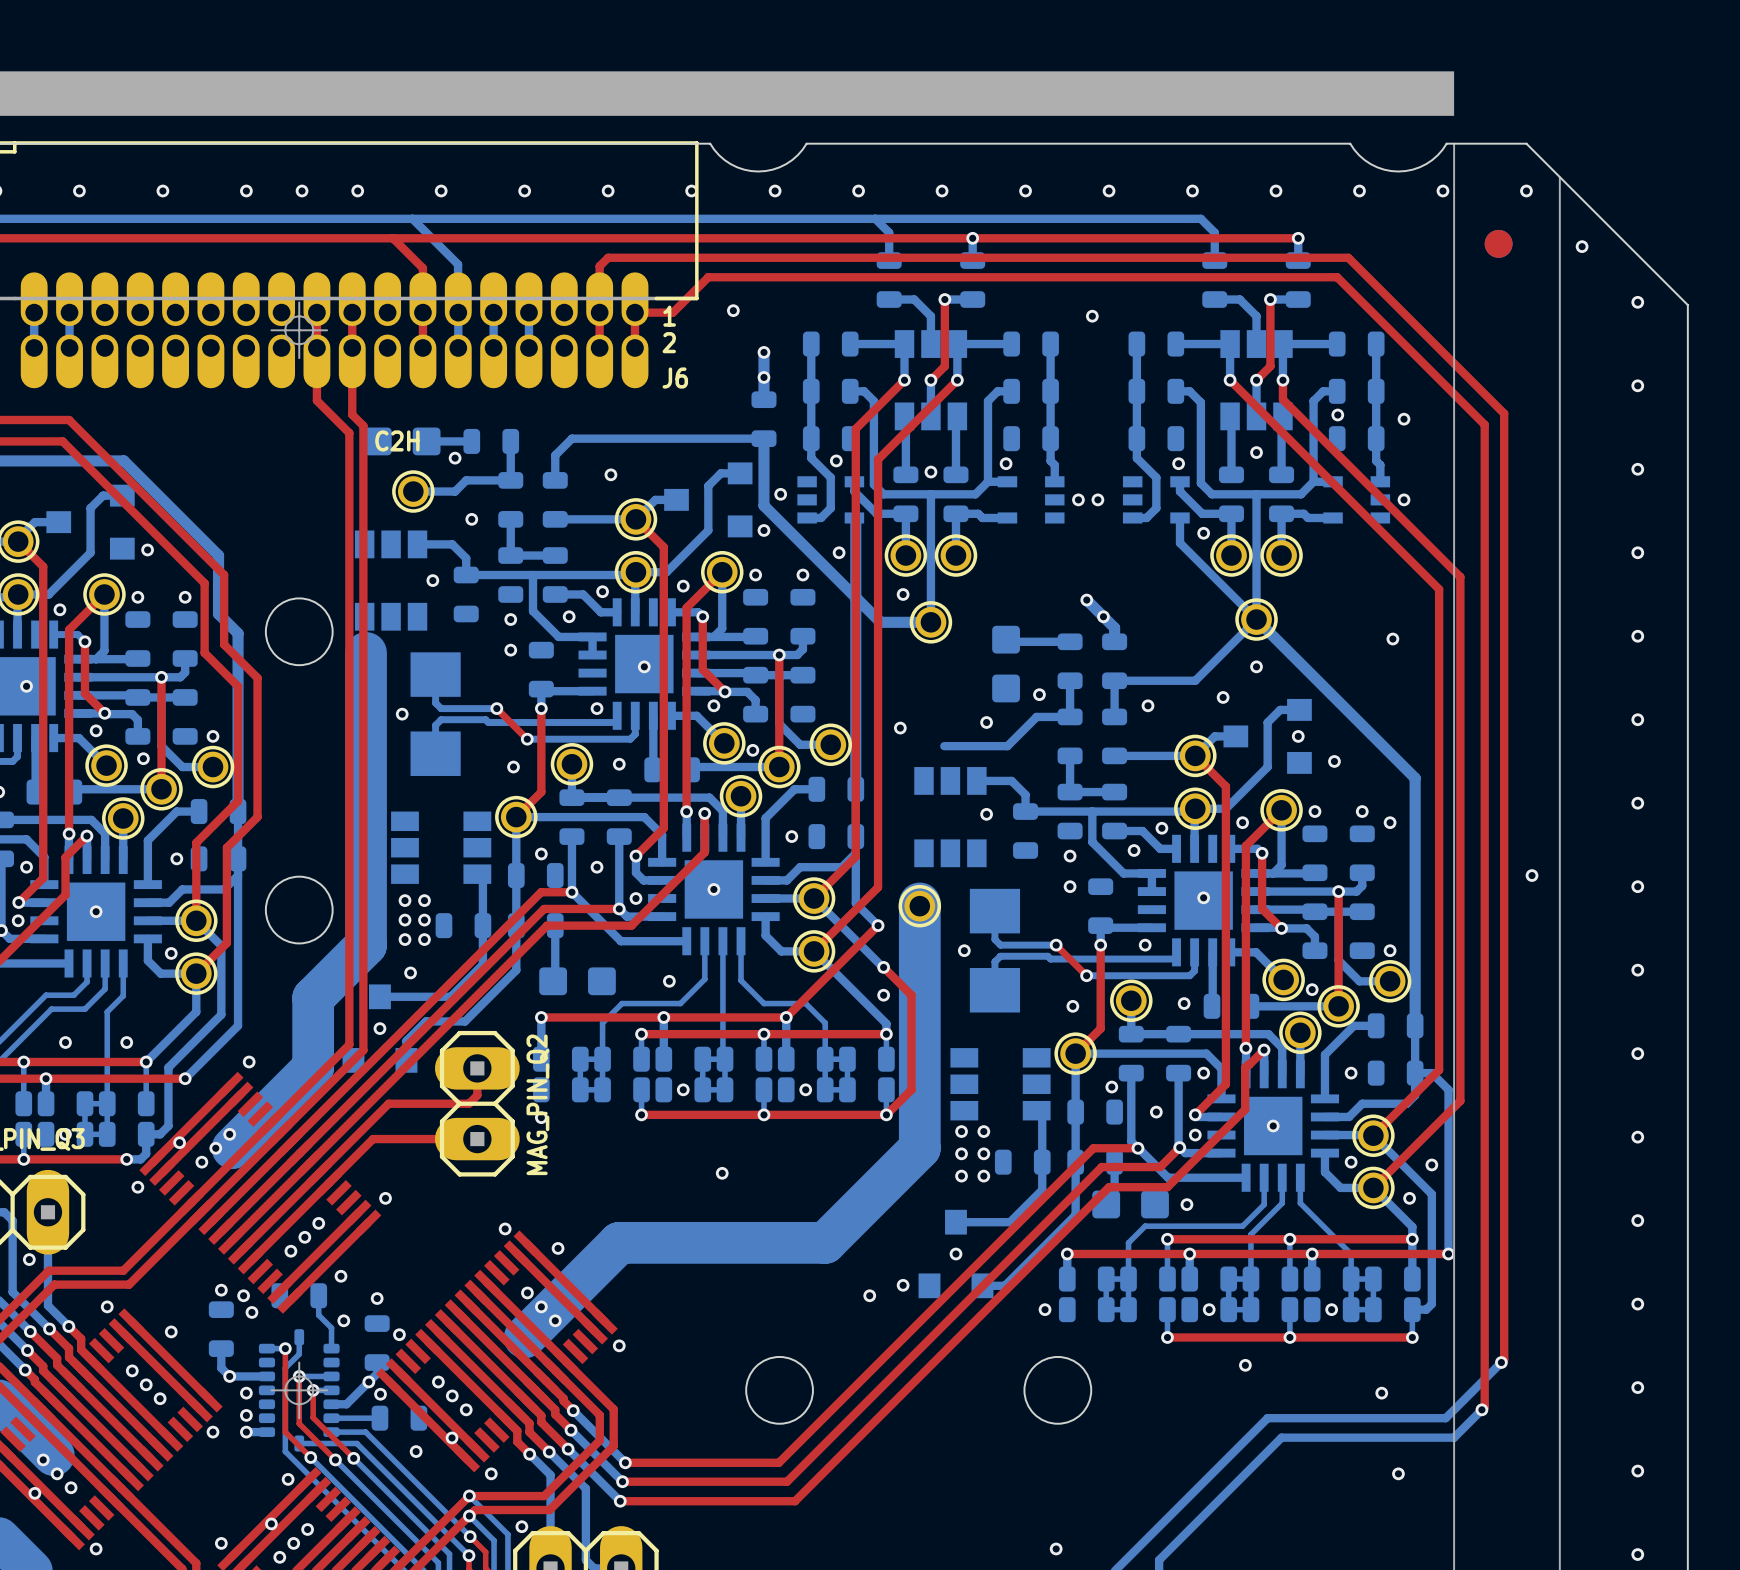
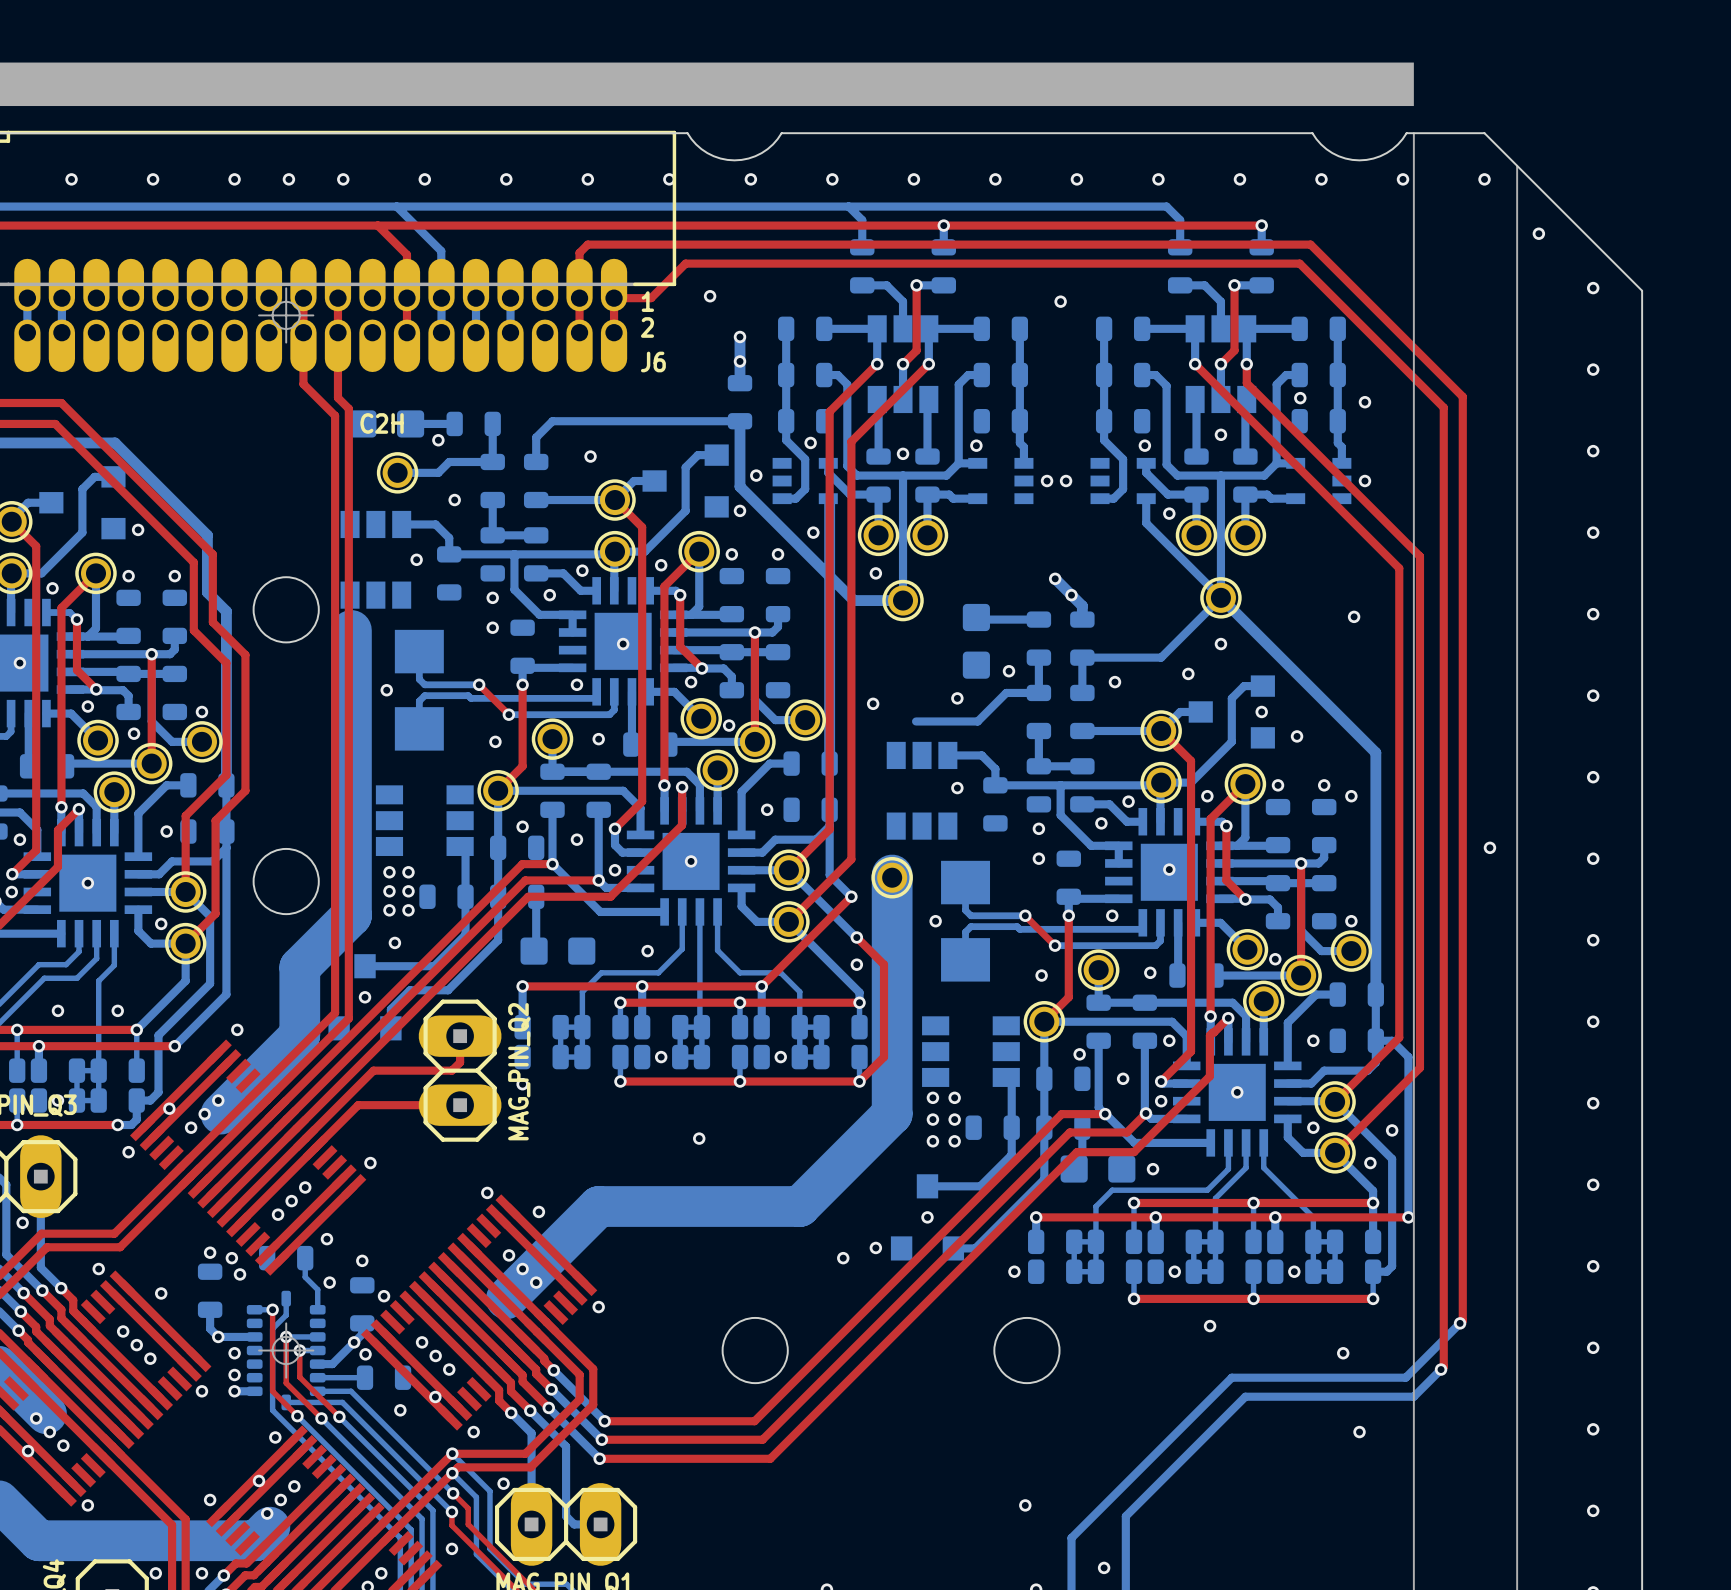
part: (1498, 243) -> none

